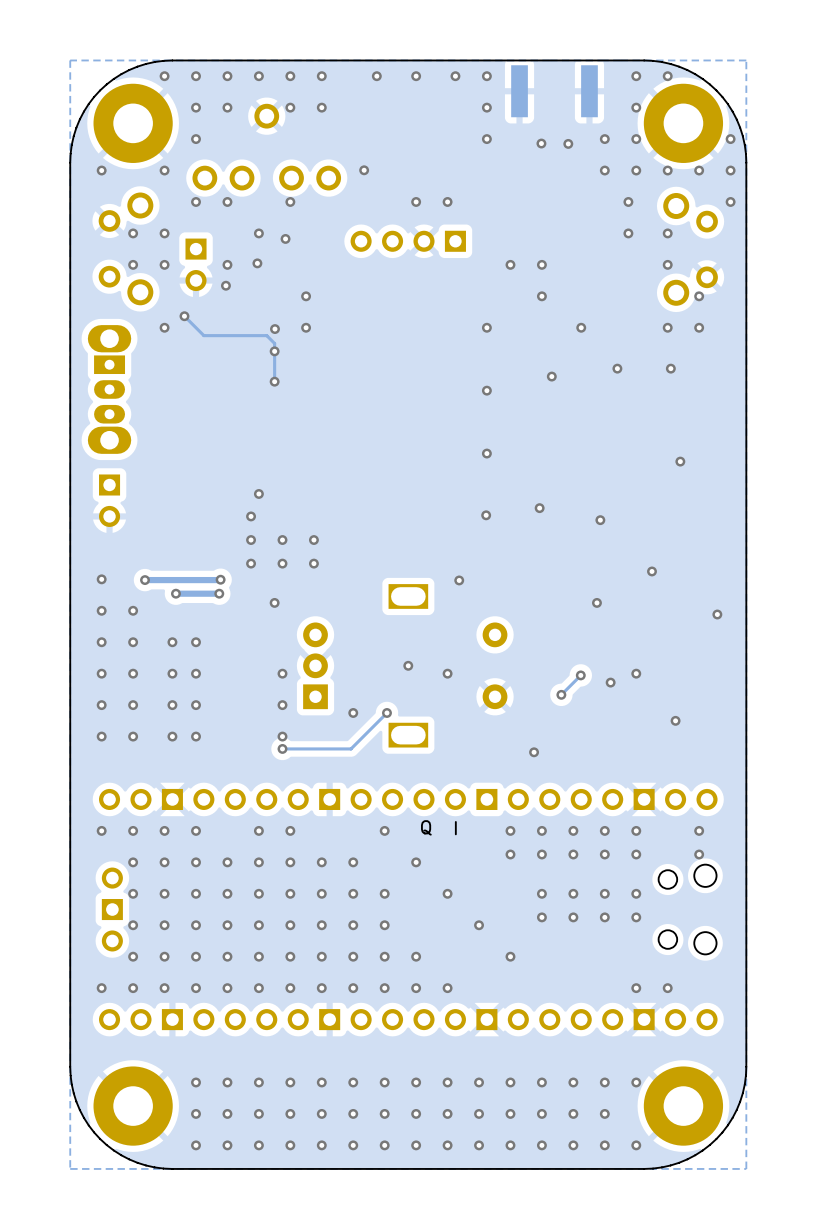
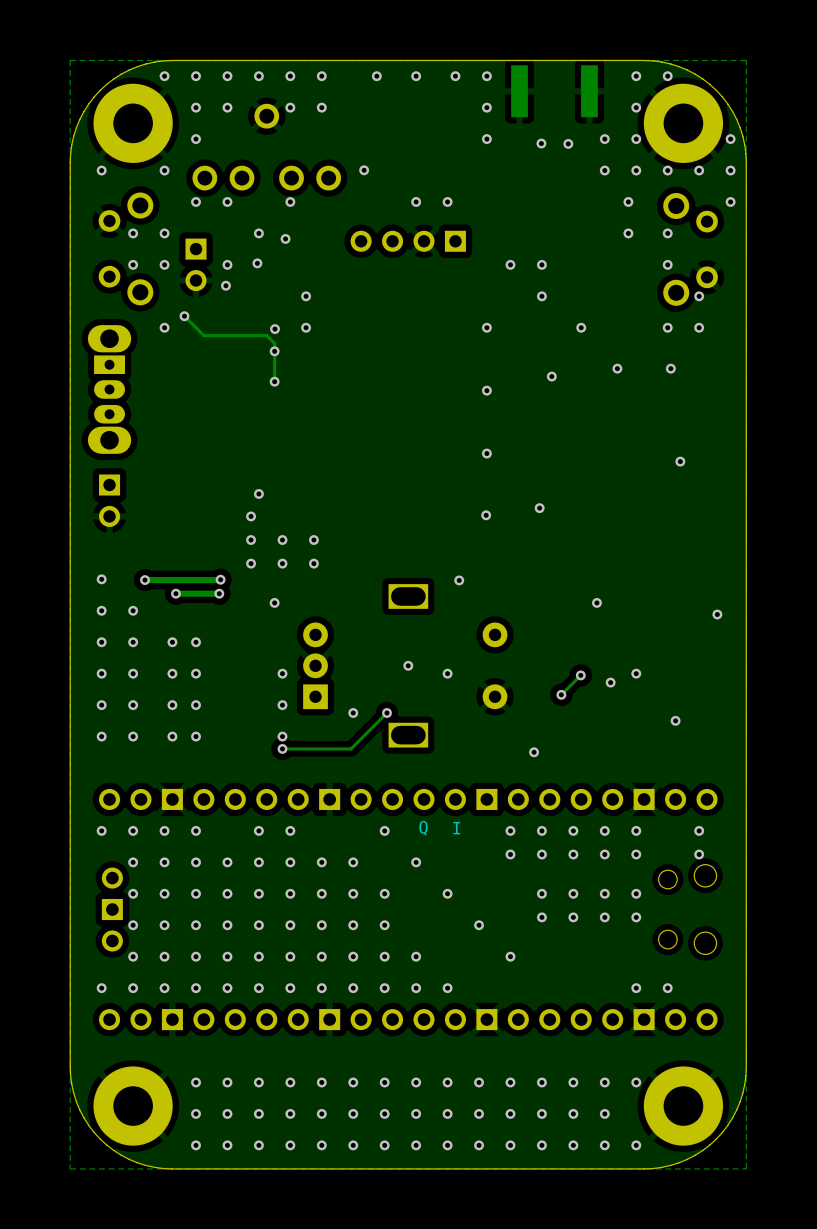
via: (600, 520) -> none
via: (651, 571) -> none

